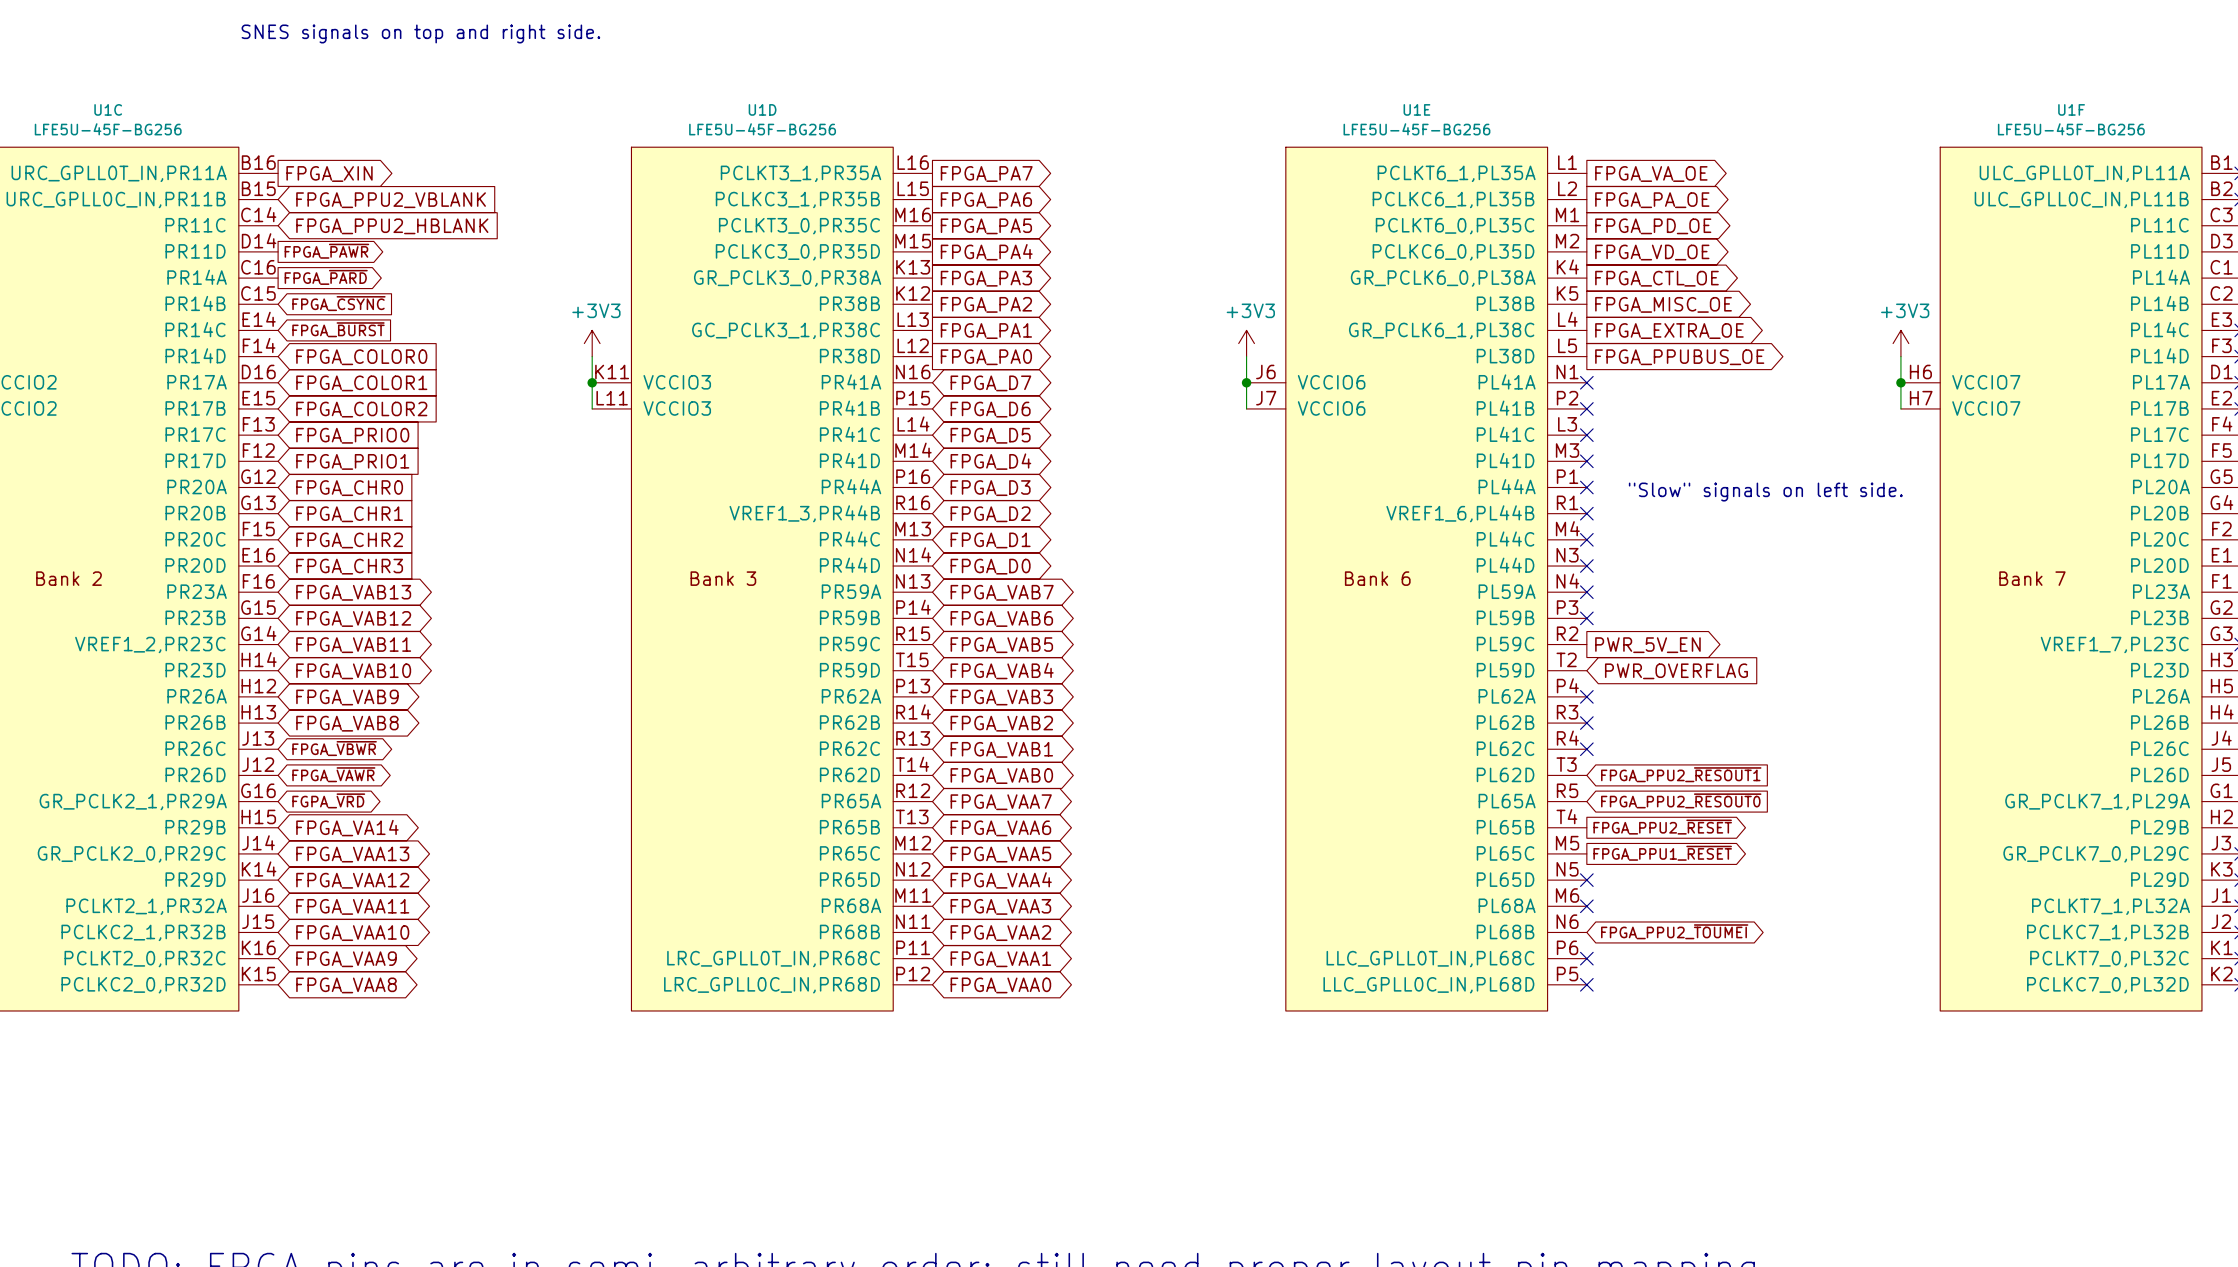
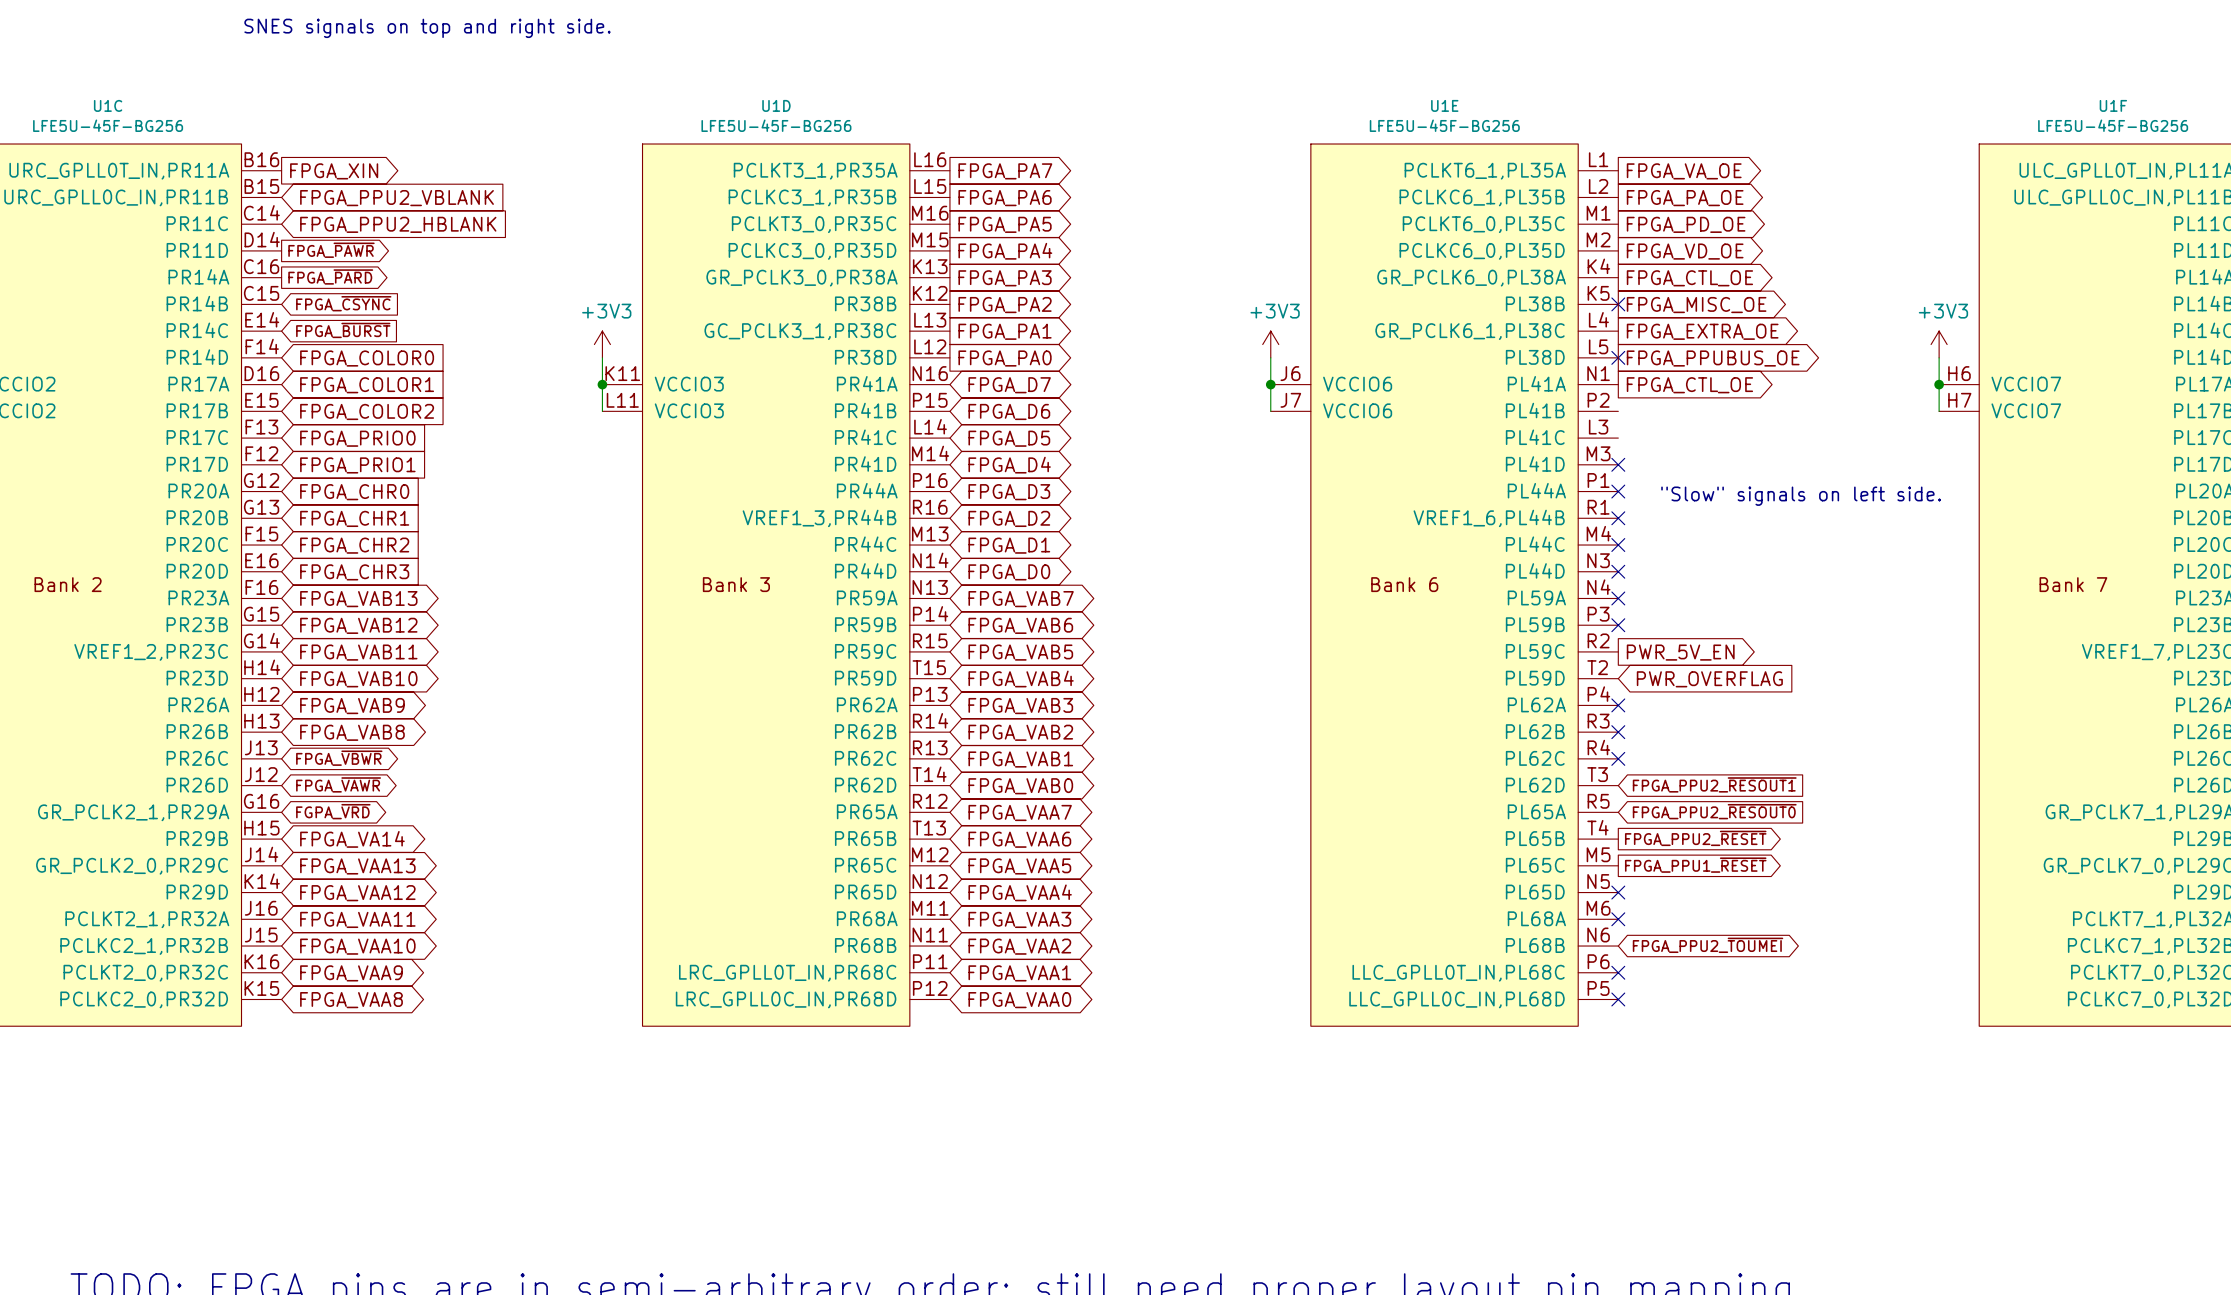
no-connect mark: none -> (1618, 304)
no-connect mark: none -> (1618, 357)
no-connect mark: (1586, 382) -> none
global label: none -> FPGA_CTL_OE (1689, 385)
no-connect mark: (1586, 408) -> none
no-connect mark: (1586, 435) -> none

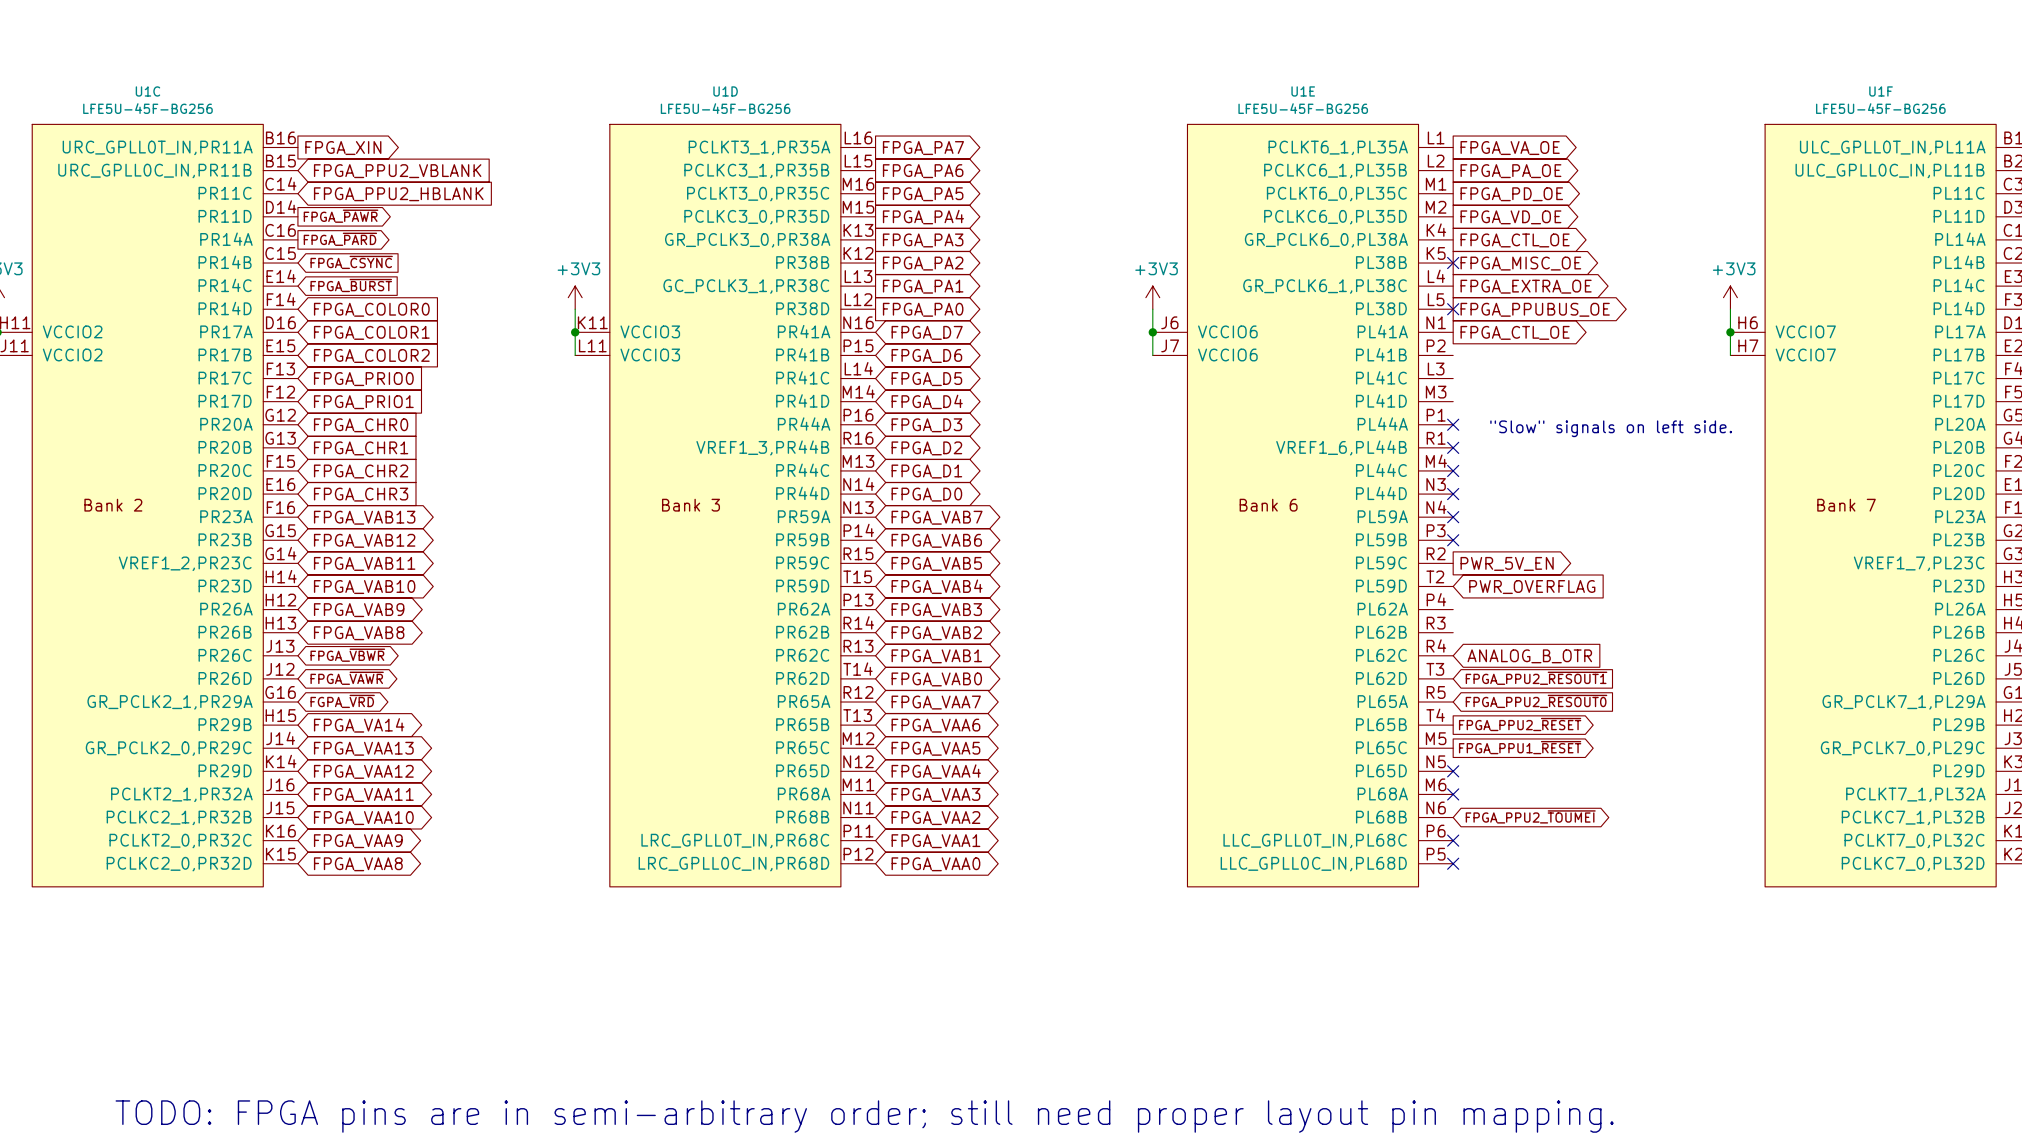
text: SNES signals on top and right side. (427, 28) -> none
no-connect mark: (1618, 464) -> none
no-connect mark: (1618, 705) -> none
no-connect mark: (1618, 732) -> none
no-connect mark: (1618, 758) -> none
global label: none -> ANALOG_B_OTR (1529, 656)

